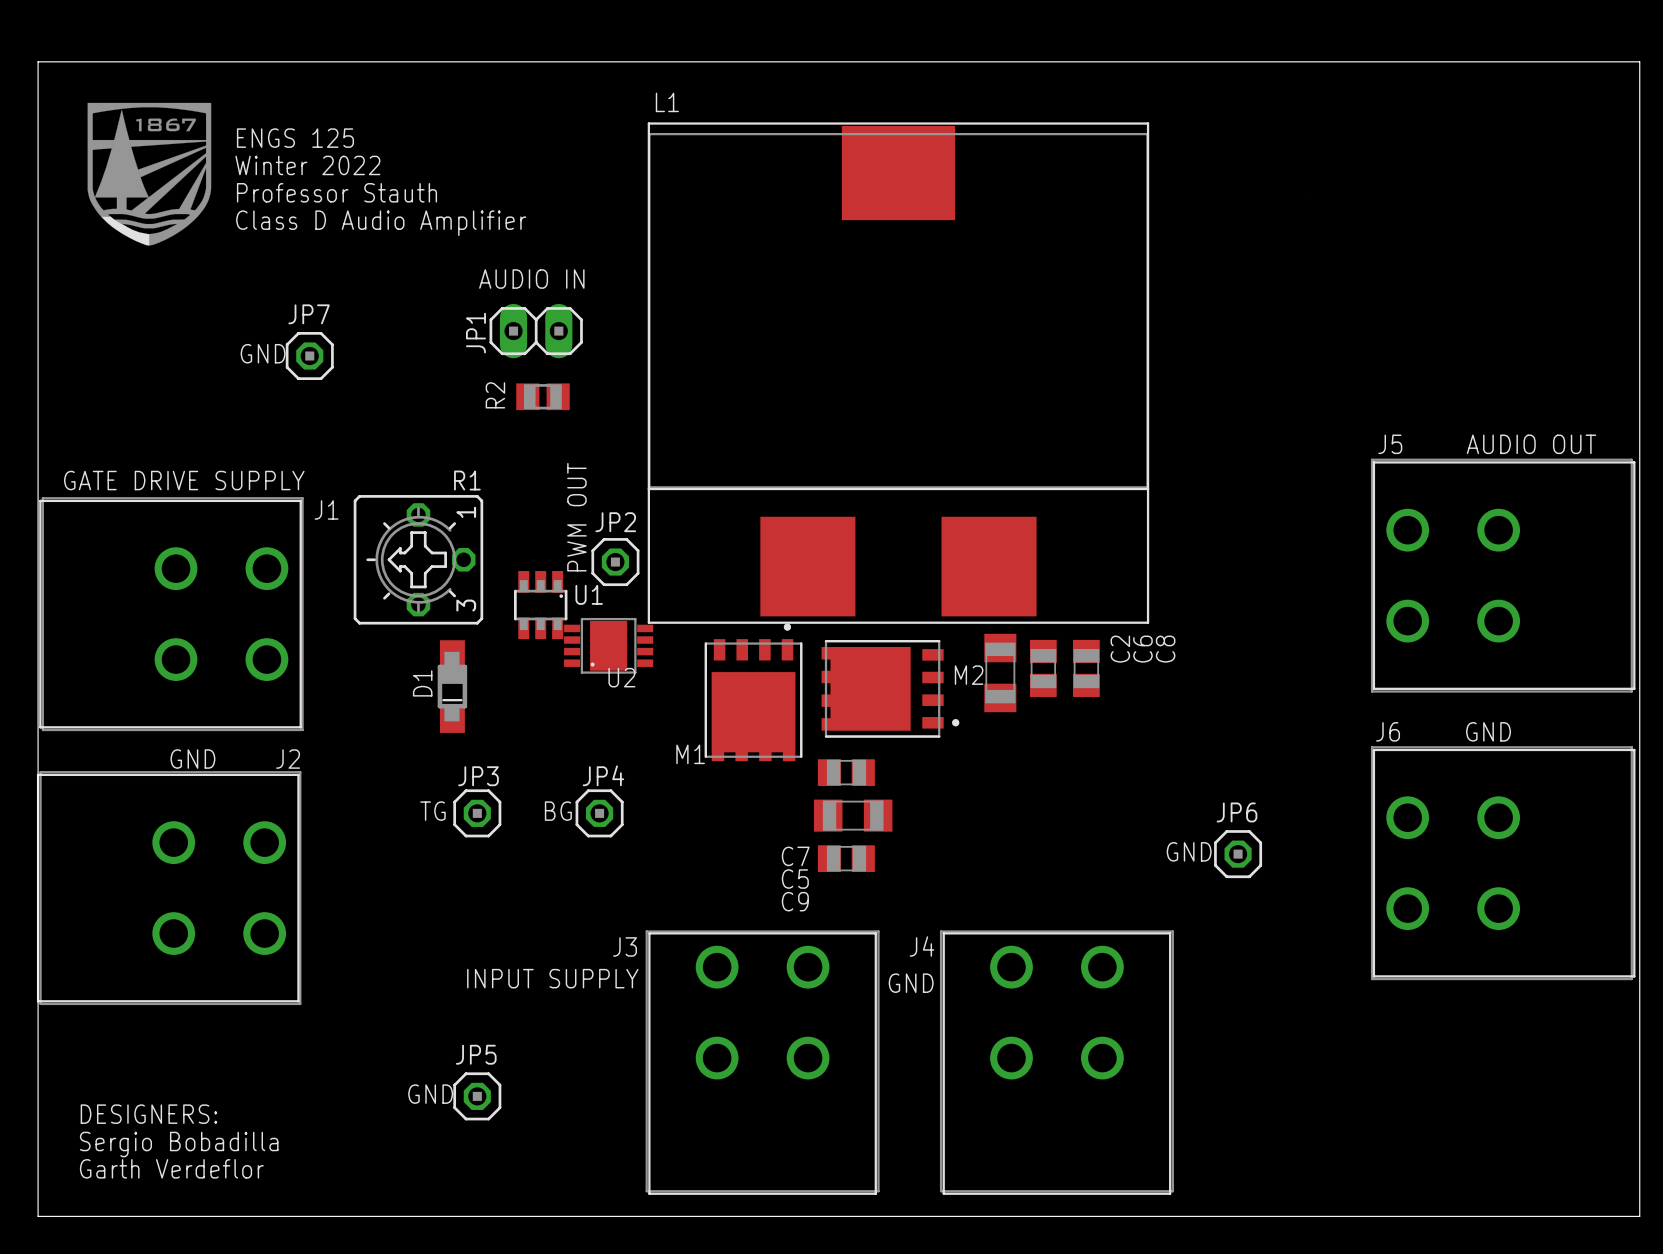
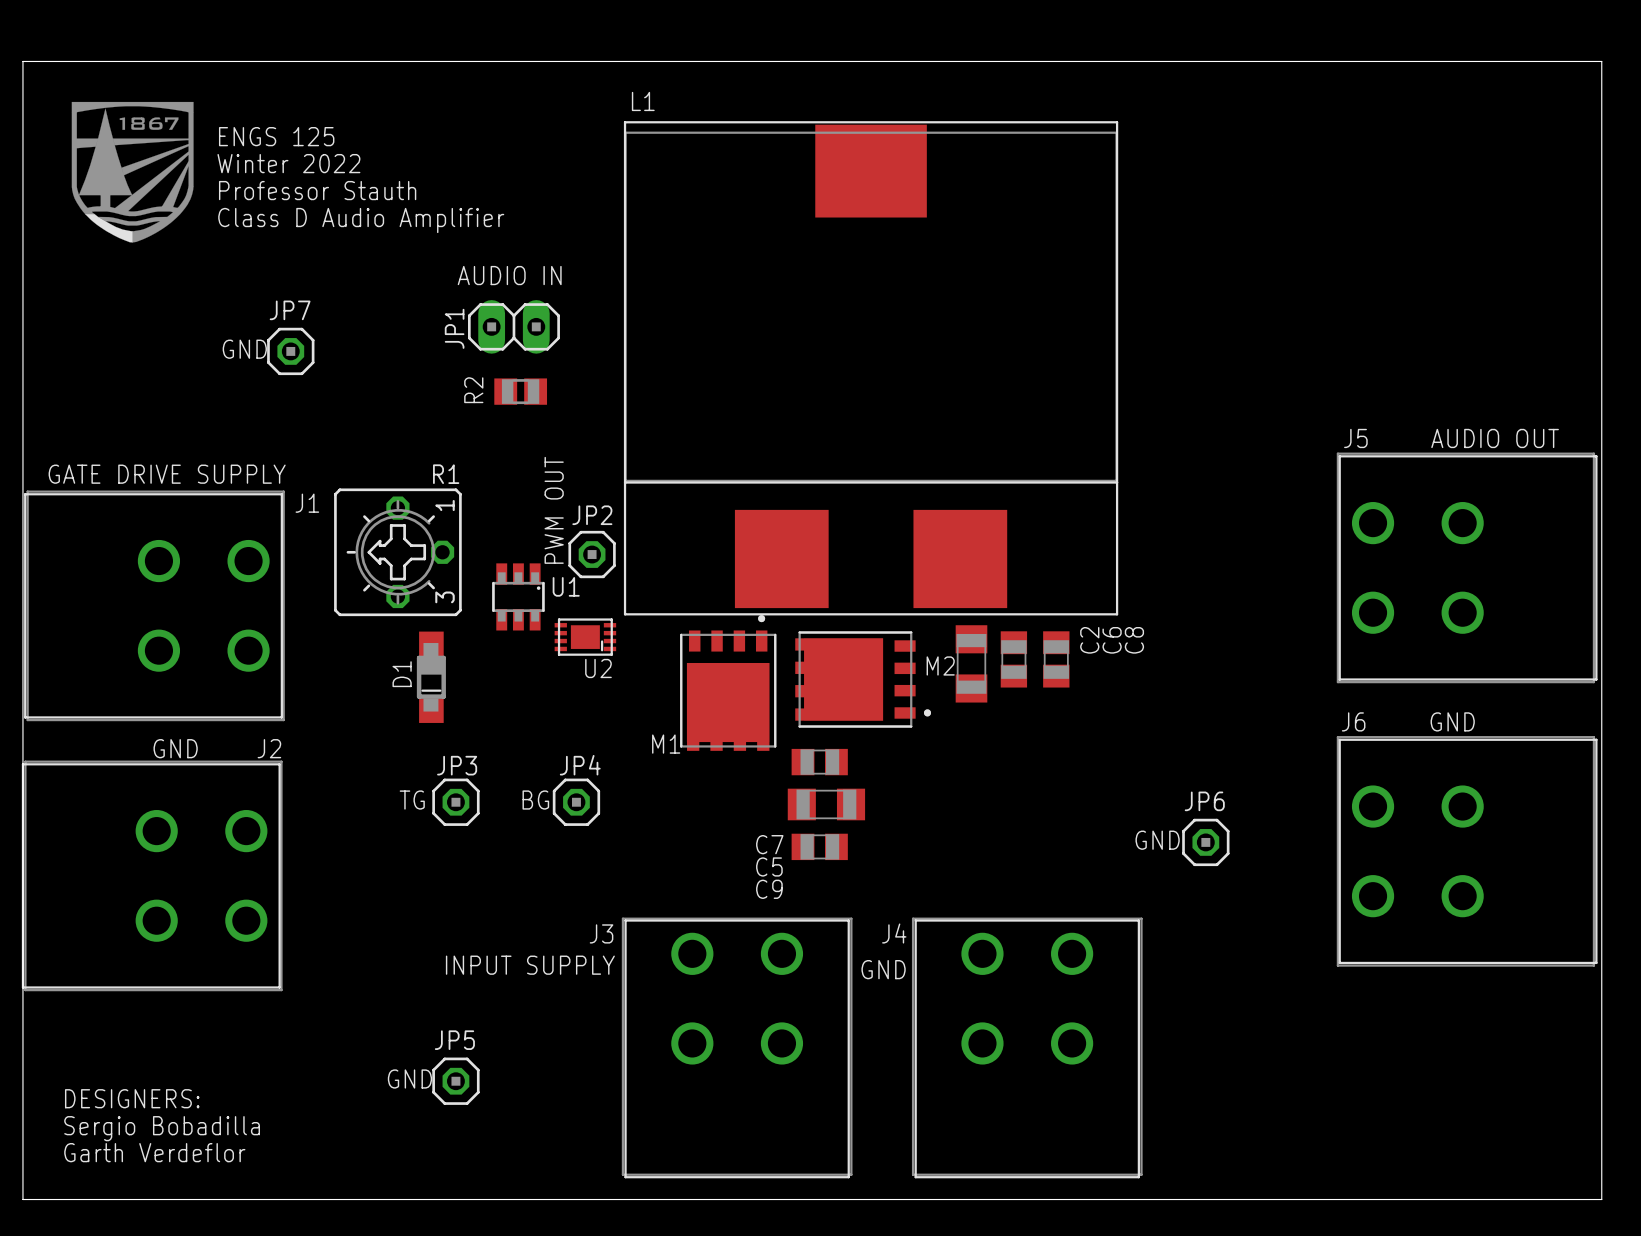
U2 footprint: [564, 617, 654, 674] -> [554, 618, 617, 656]

